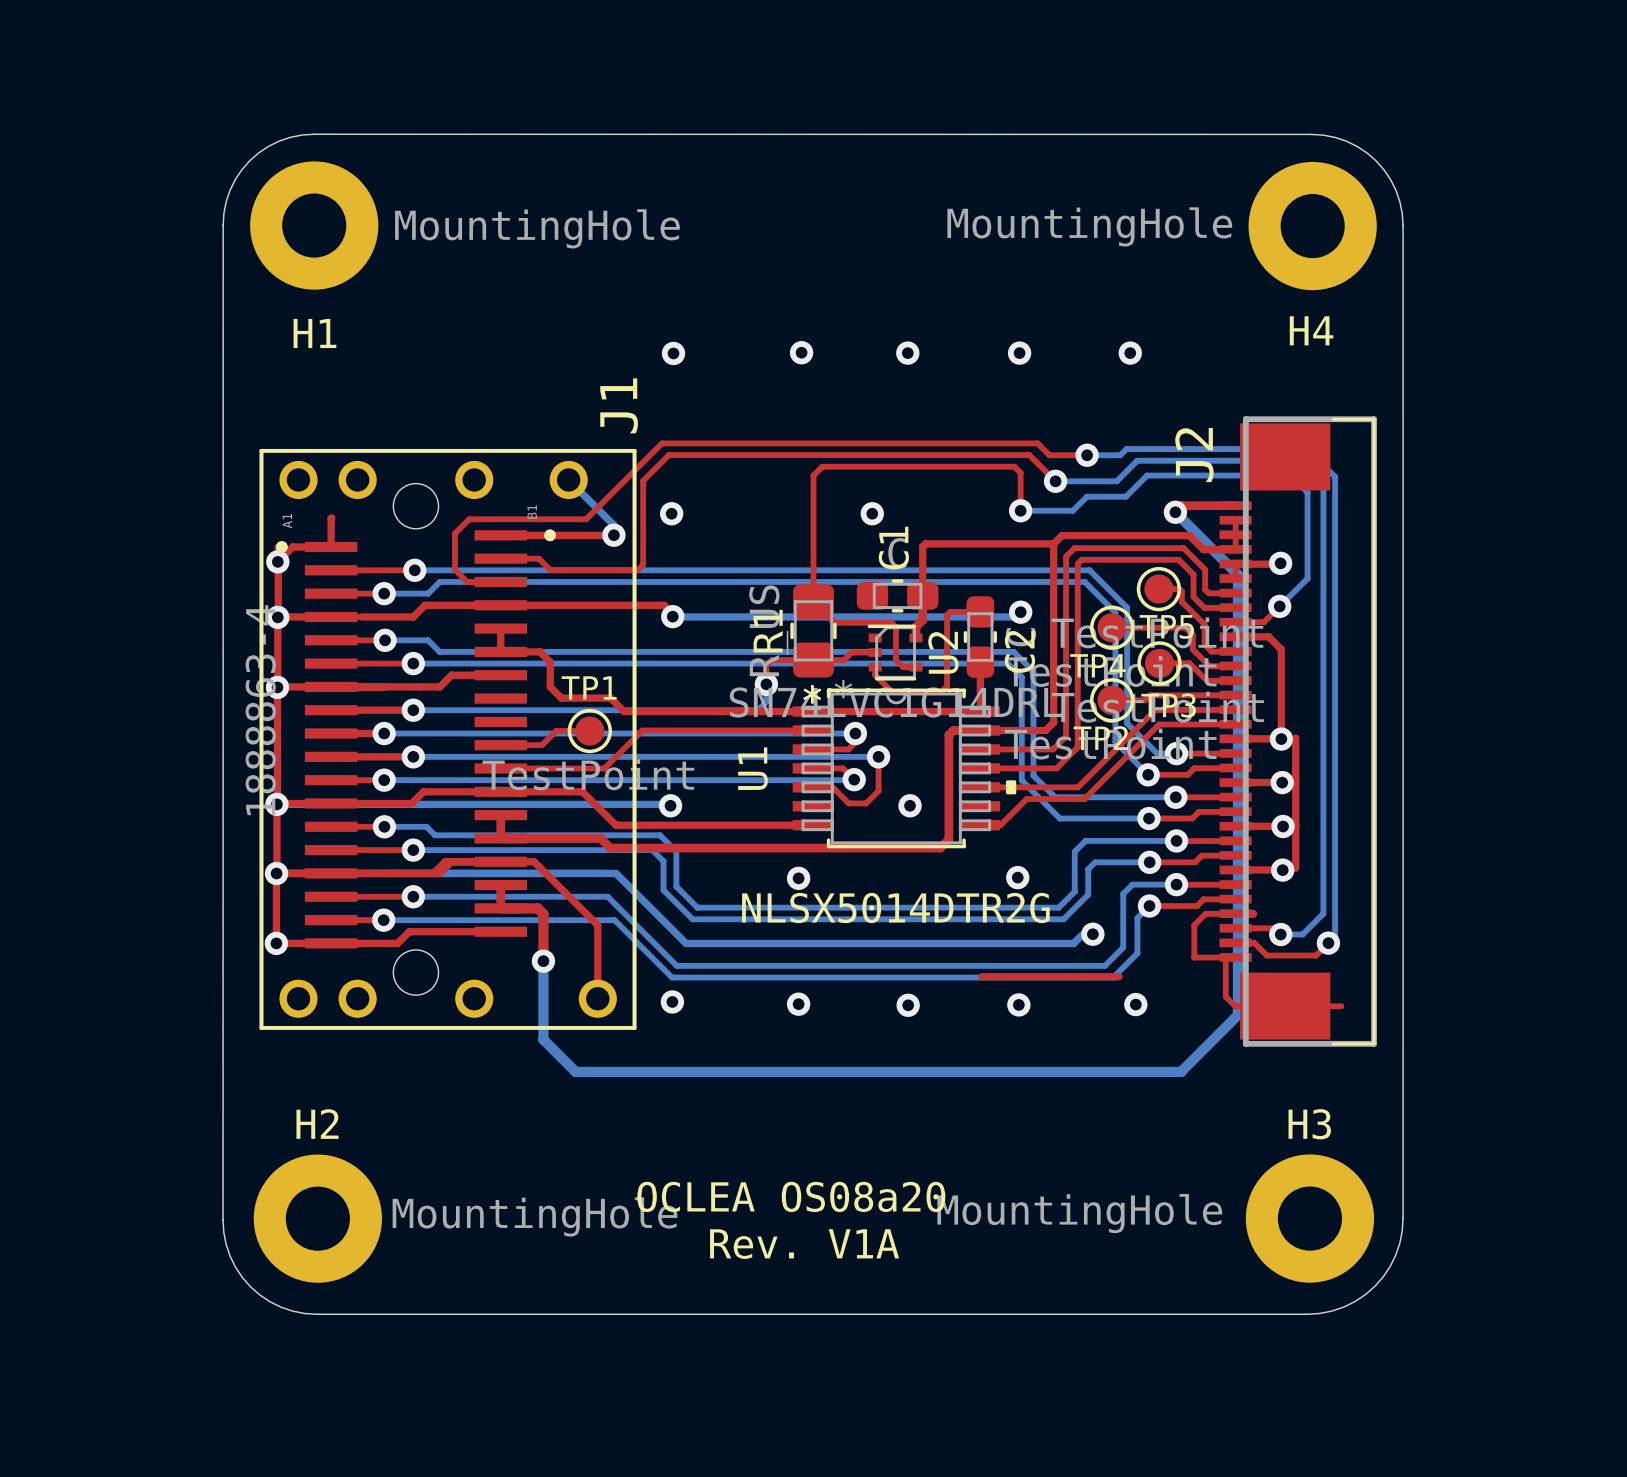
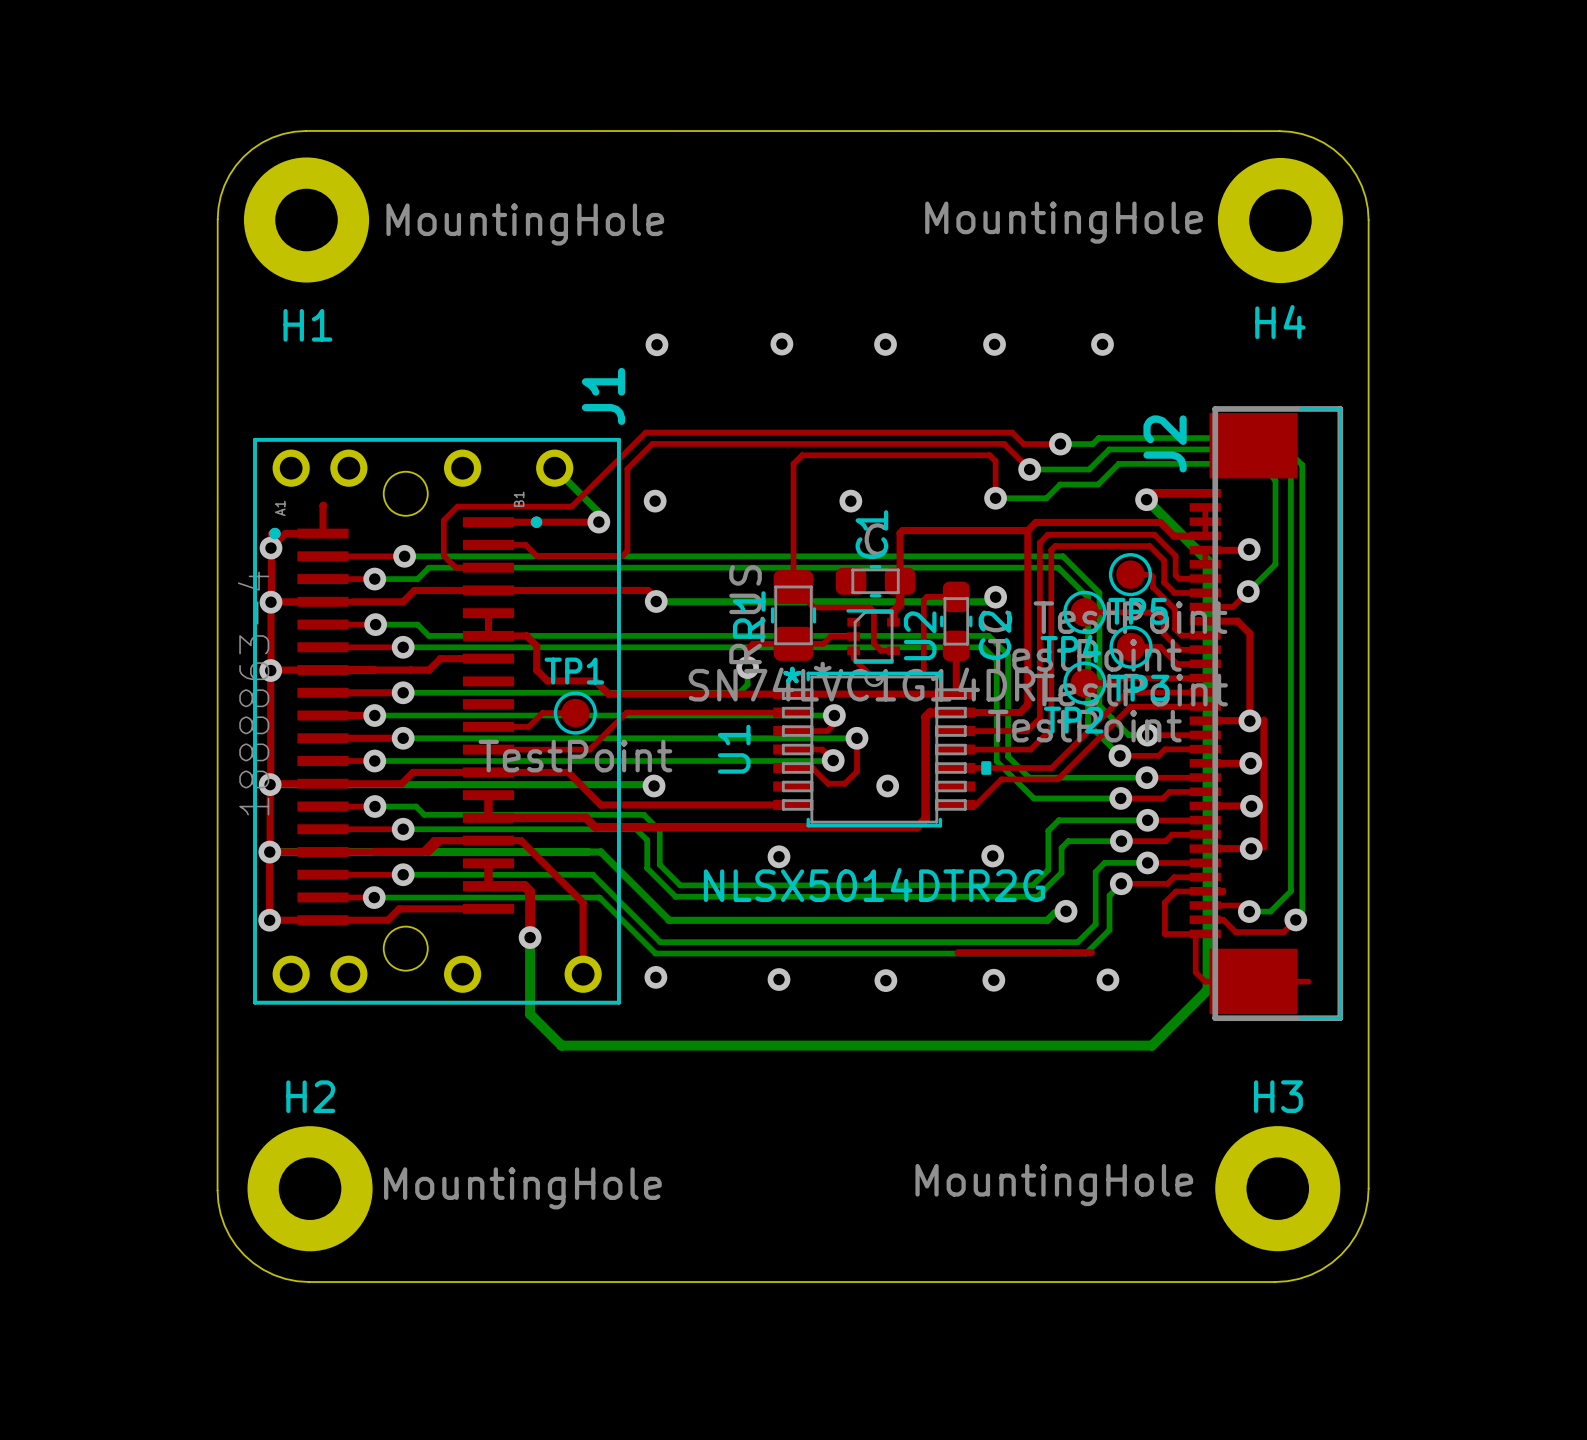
text: OCLEA OS08a20 (791, 1196) -> none
text: Rev. V1A (804, 1244) -> none

